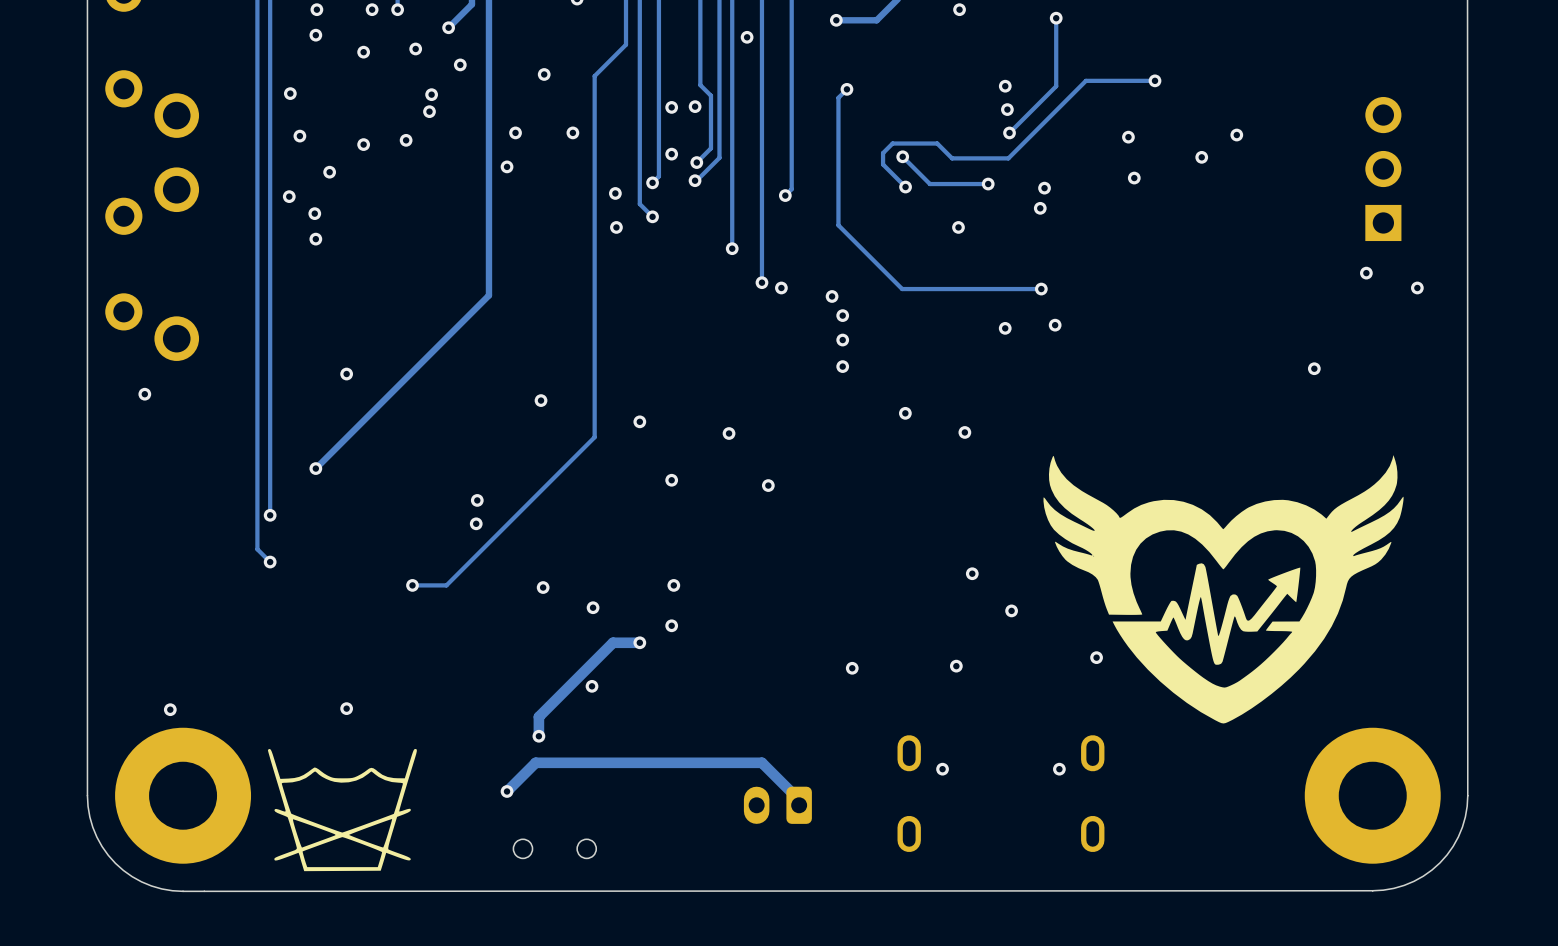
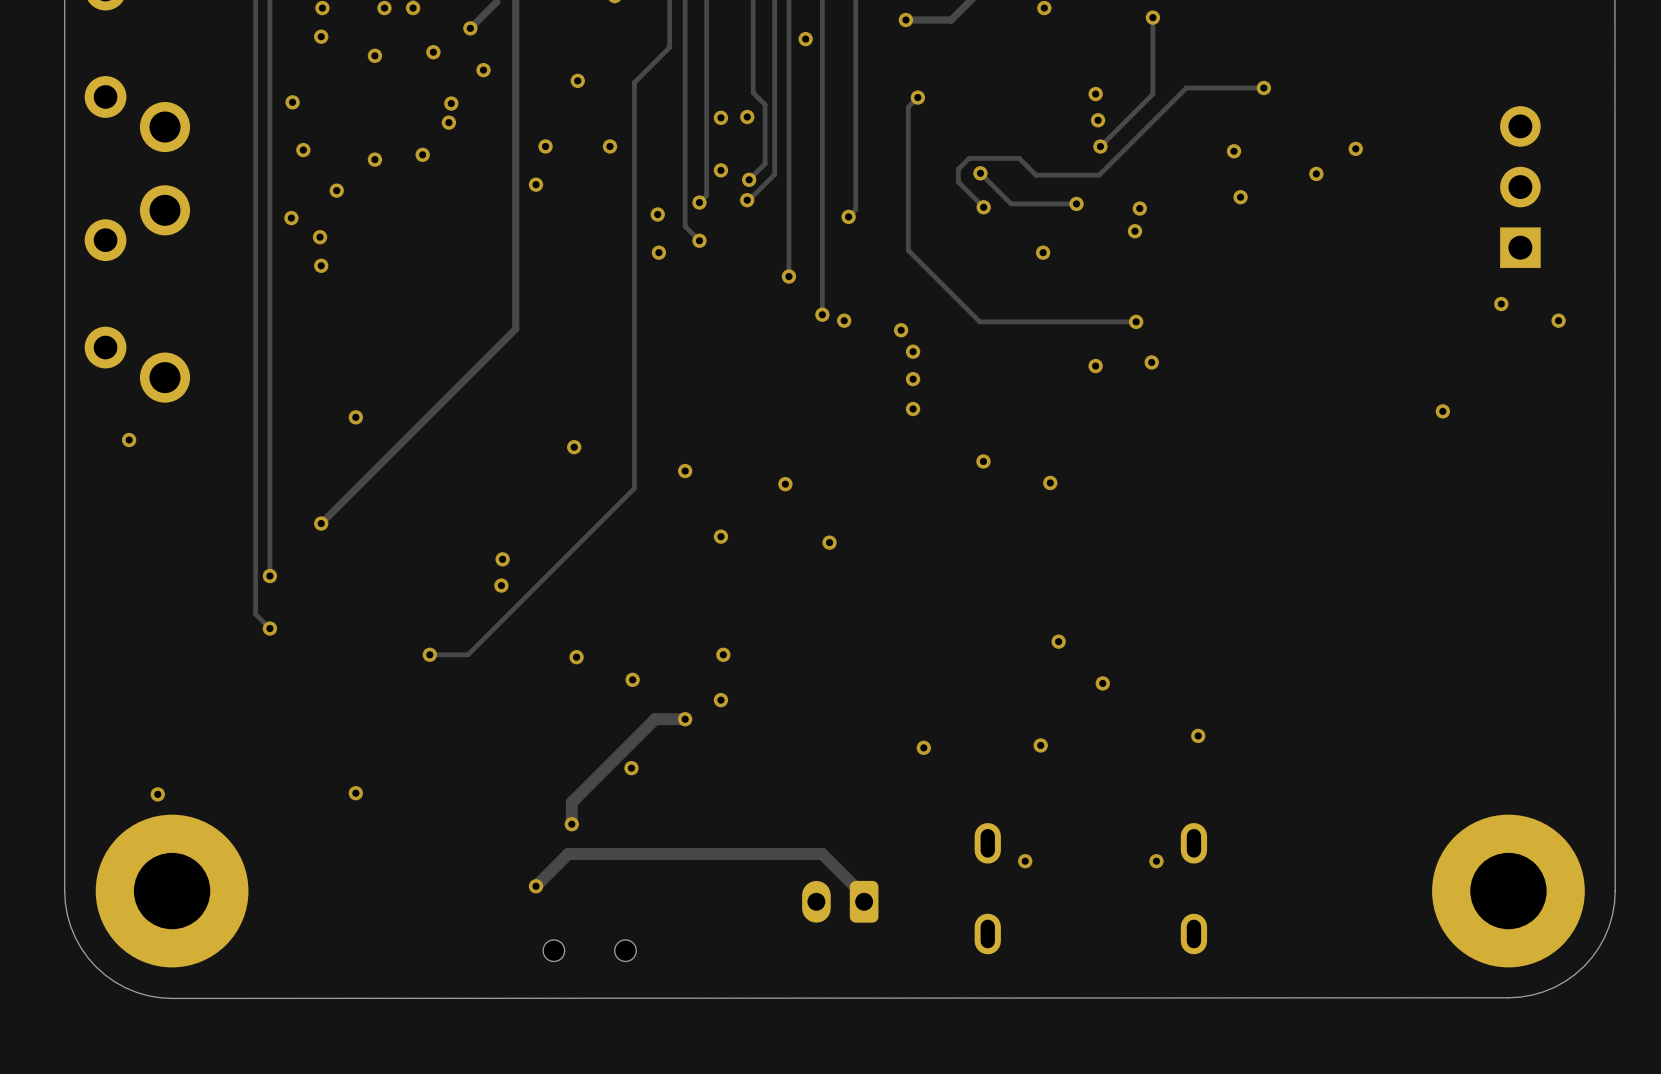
drawing: [1043, 455, 1404, 724] -> none
drawing: [267, 748, 417, 872] -> none

